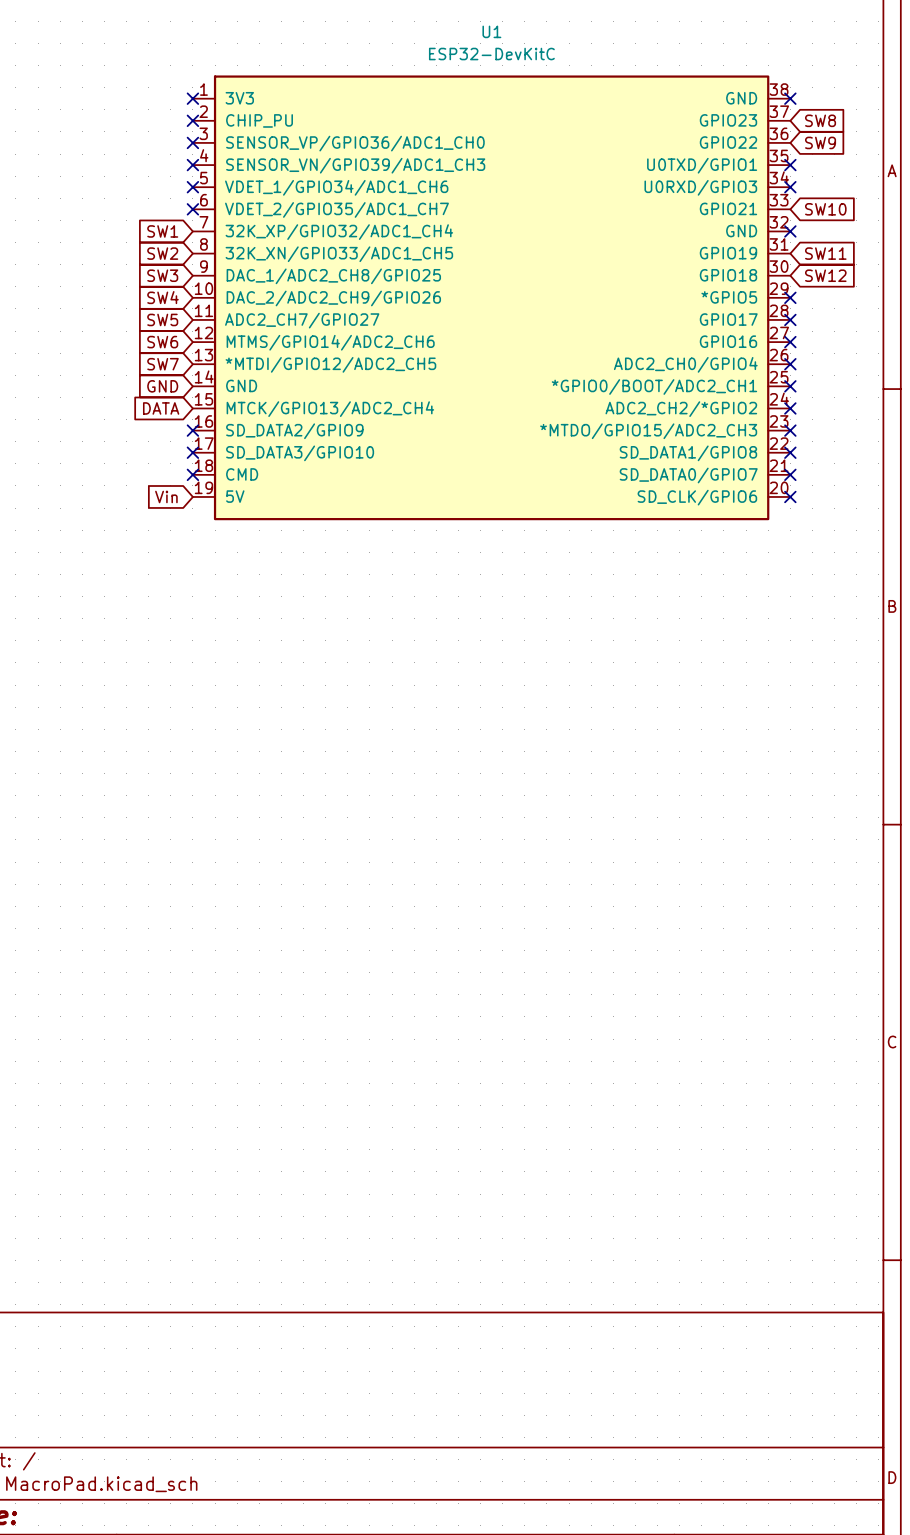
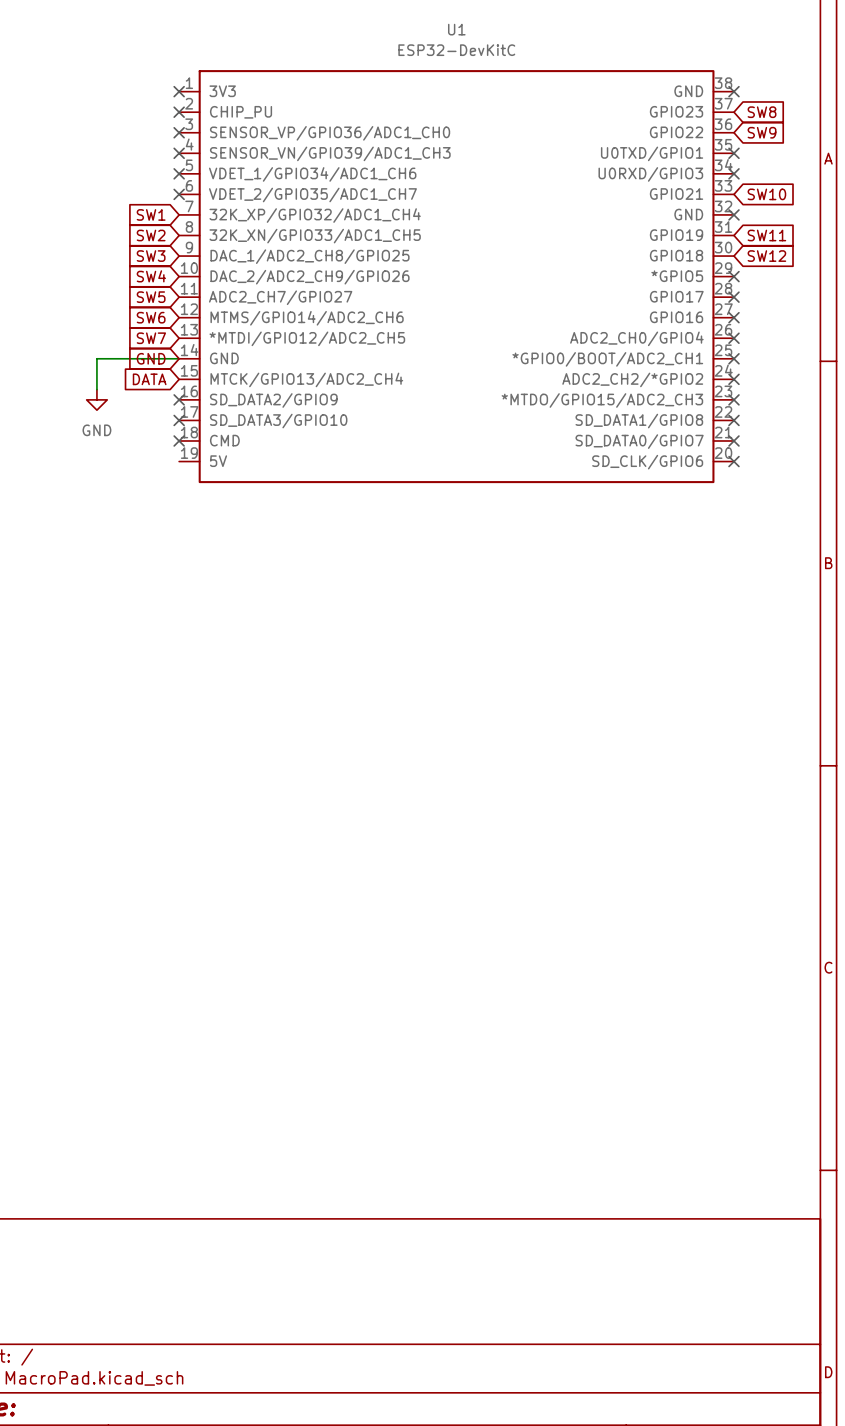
wire: none -> (179, 358) (96, 358) (96, 389)
power symbol: none -> GND (96, 399)
global label: Vin (166, 496) -> none

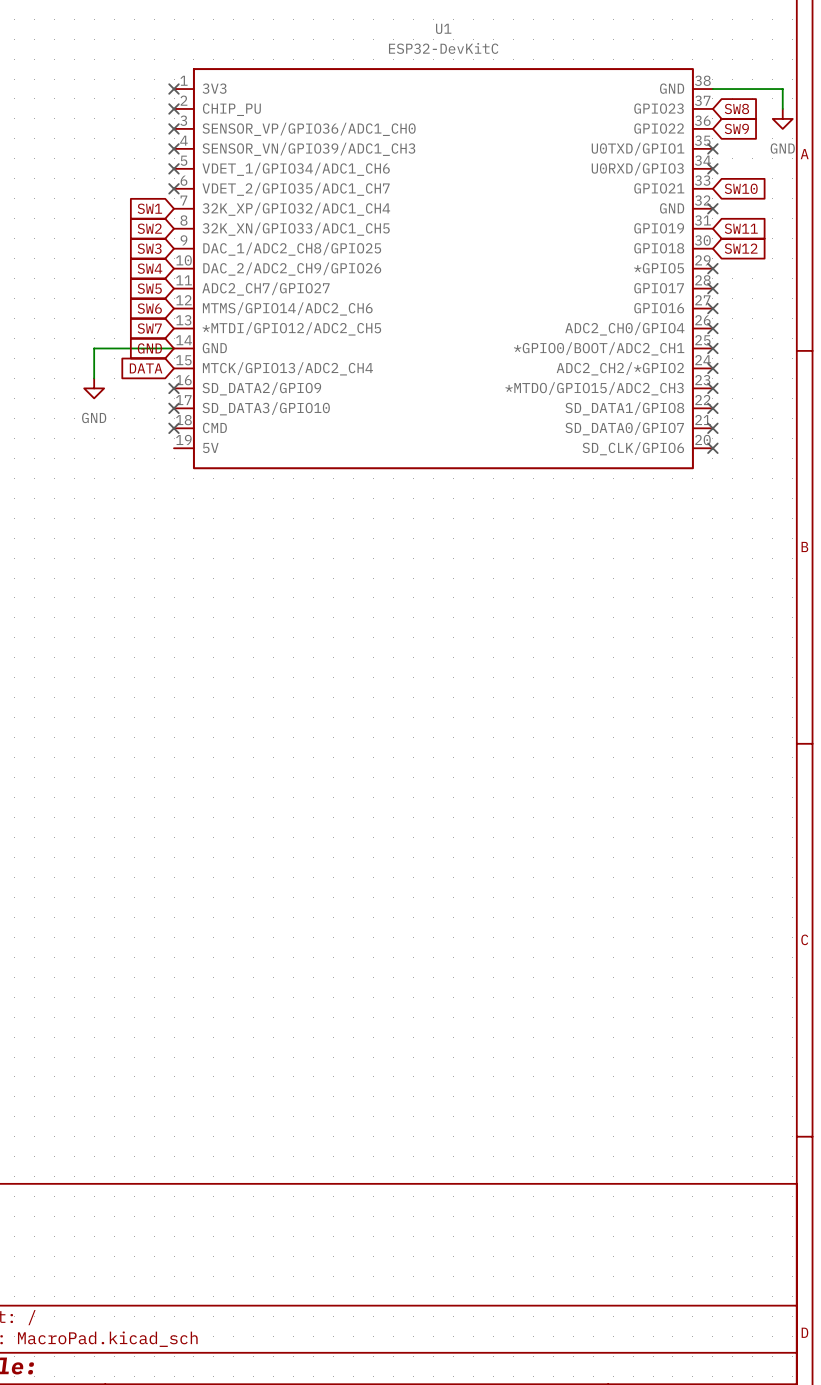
wire: none -> (712, 89) (782, 89) (782, 108)
no-connect mark: (733, 91) -> none
power symbol: none -> GND (782, 118)

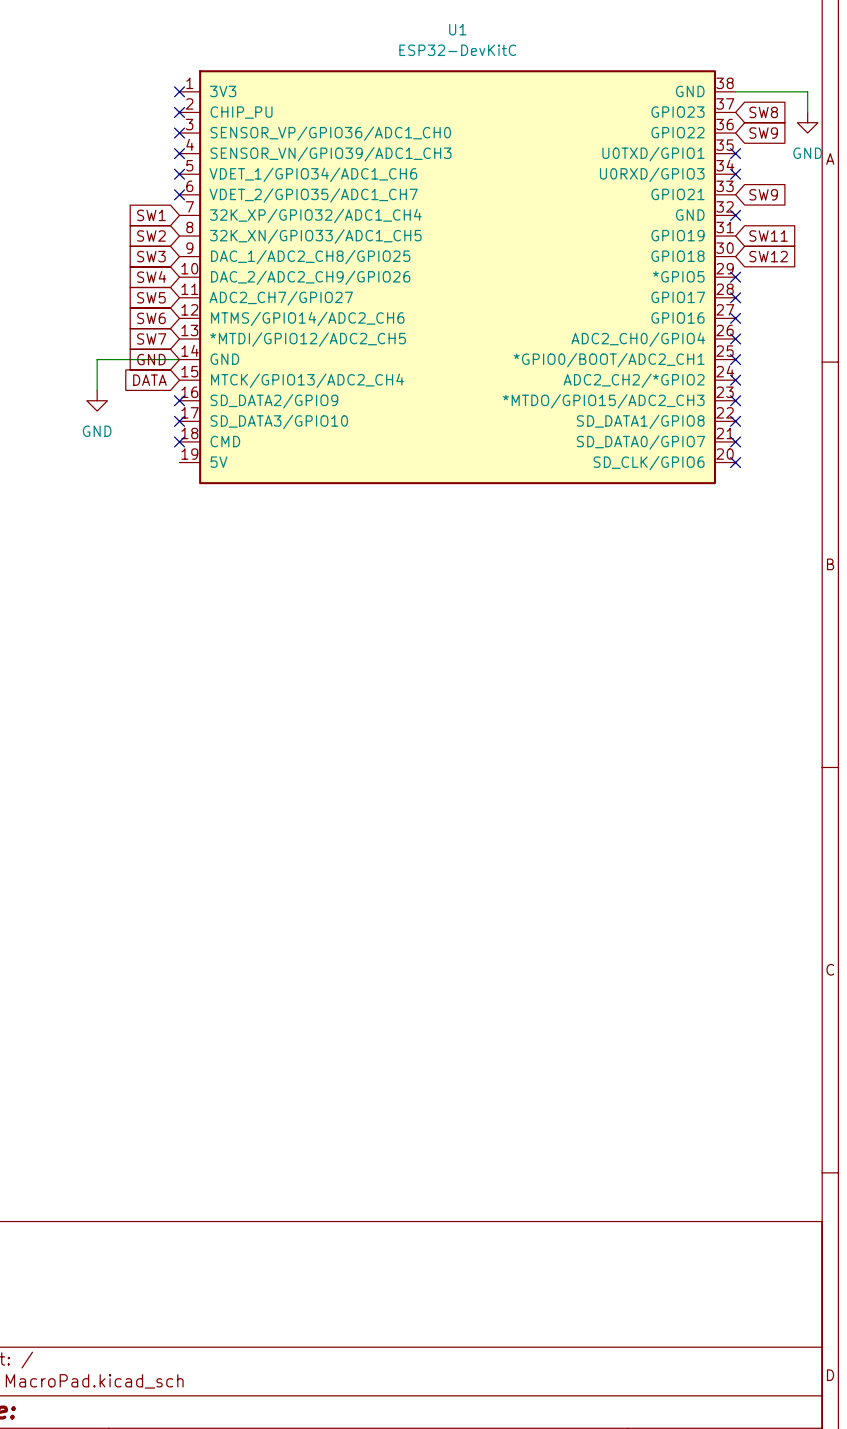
global label: SW10 (741, 188) -> SW9 (763, 194)

